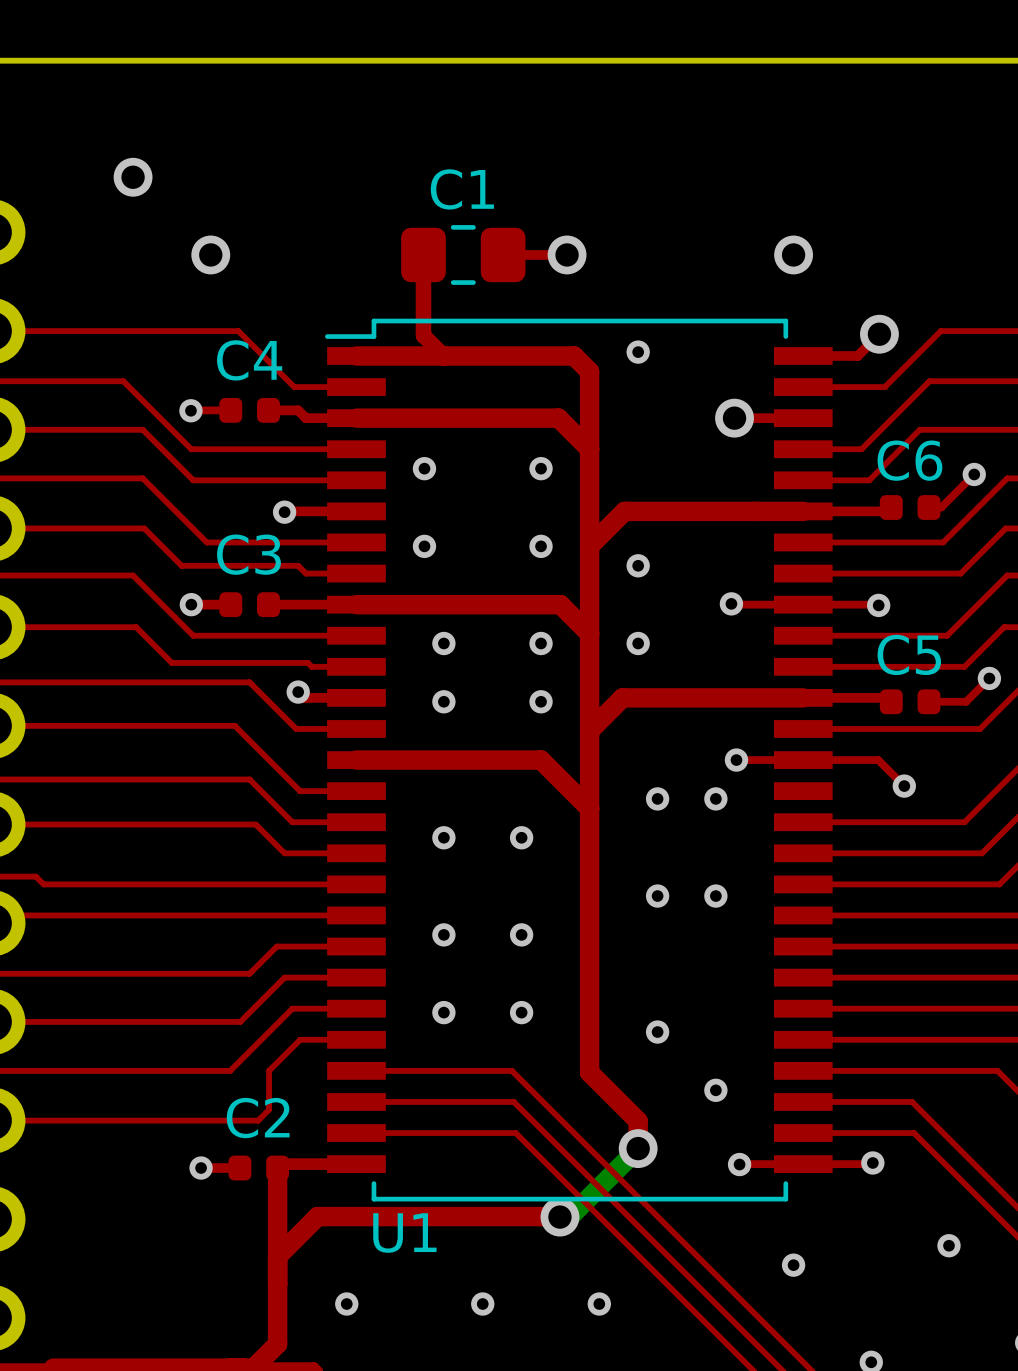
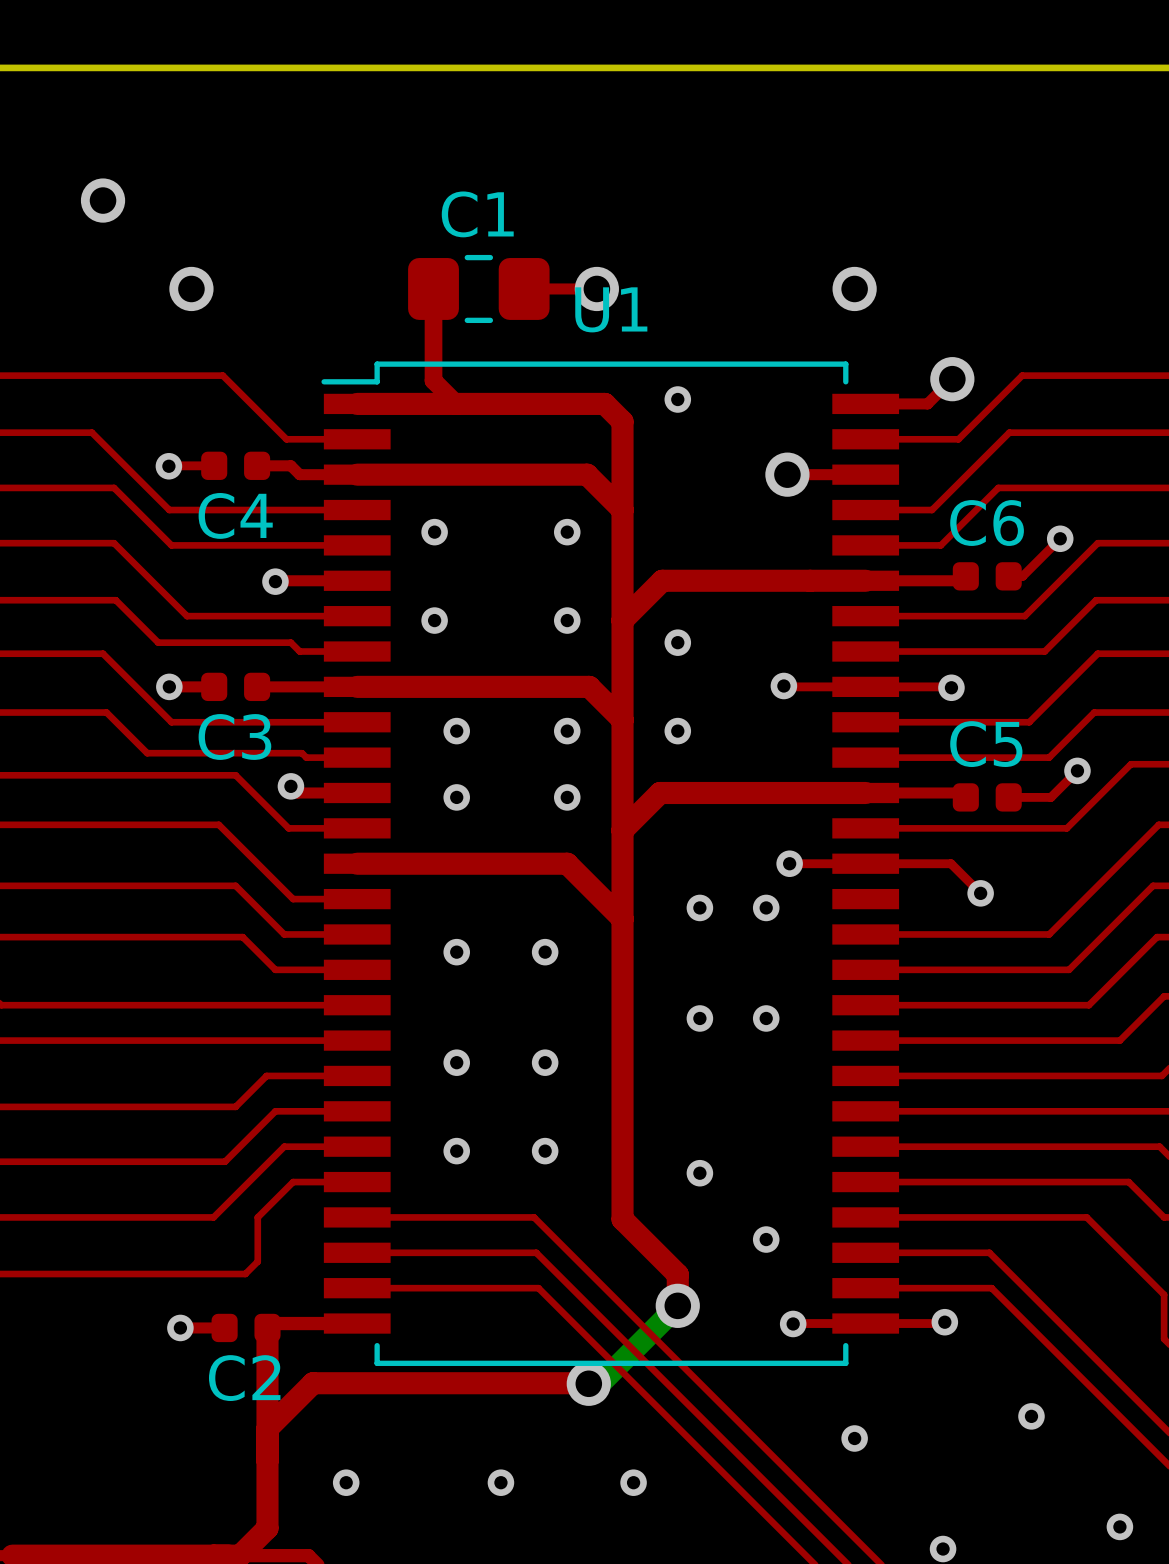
C4 name position: C4 (249, 360) -> C4 (235, 515)
C3 name position: C3 (248, 554) -> C3 (234, 736)
C2 name position: C2 (258, 1118) -> C2 (244, 1378)
U1 name position: U1 (404, 1233) -> U1 (611, 309)

